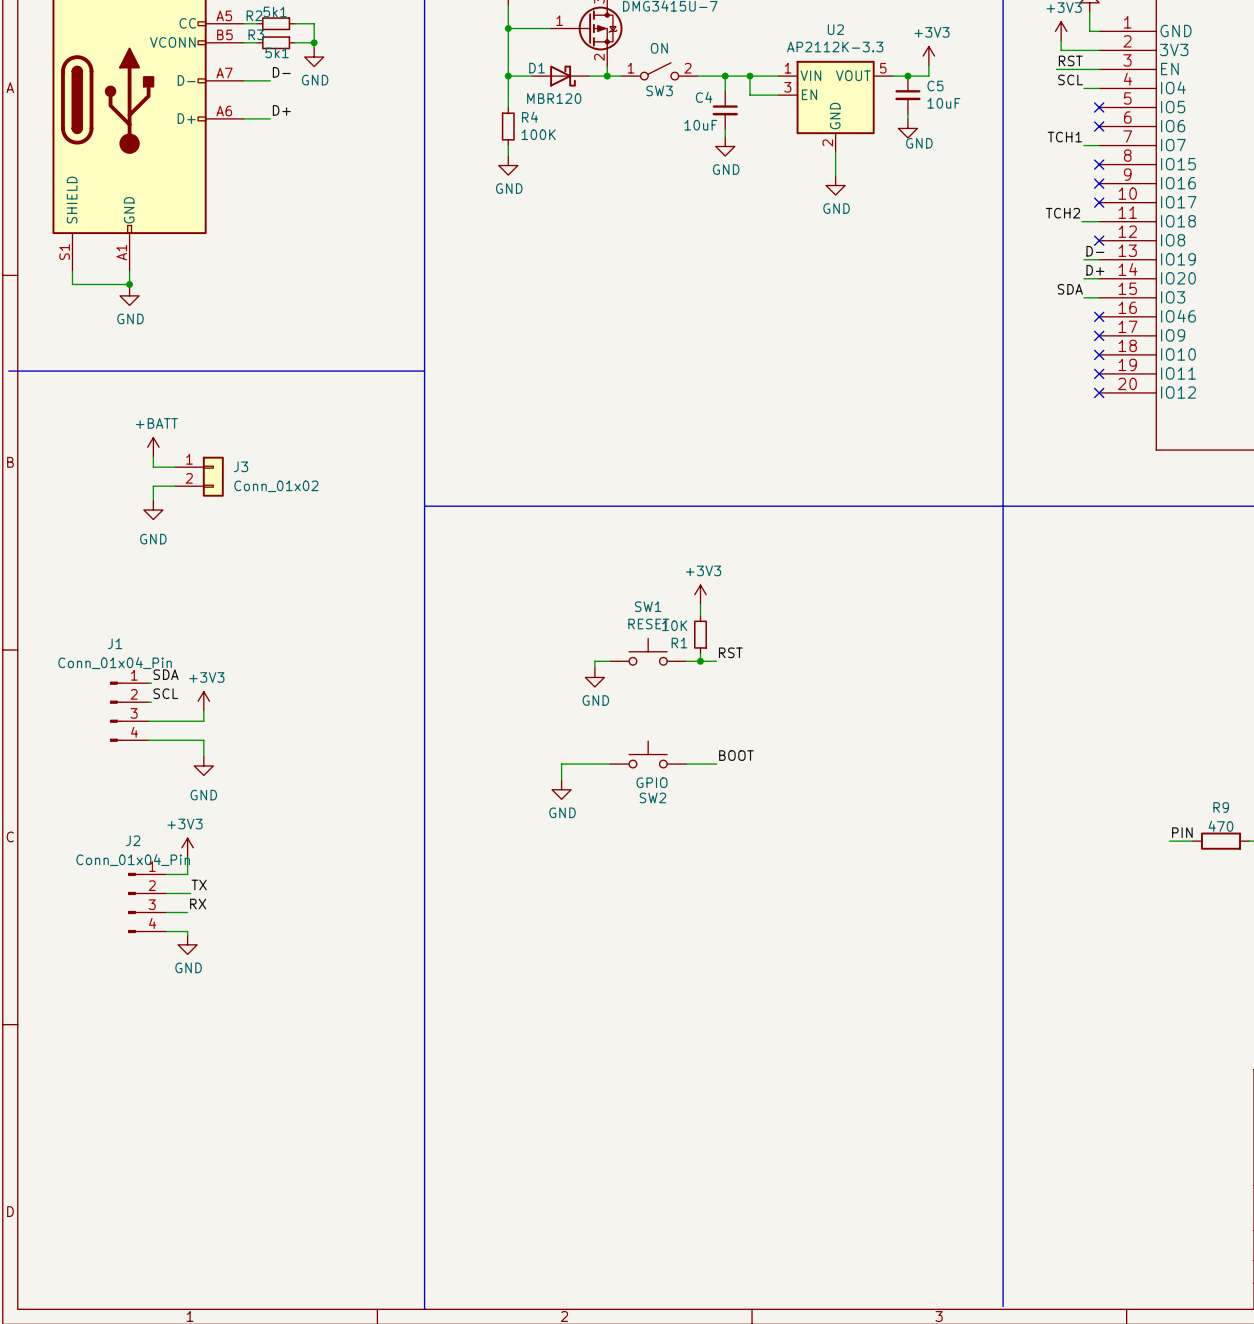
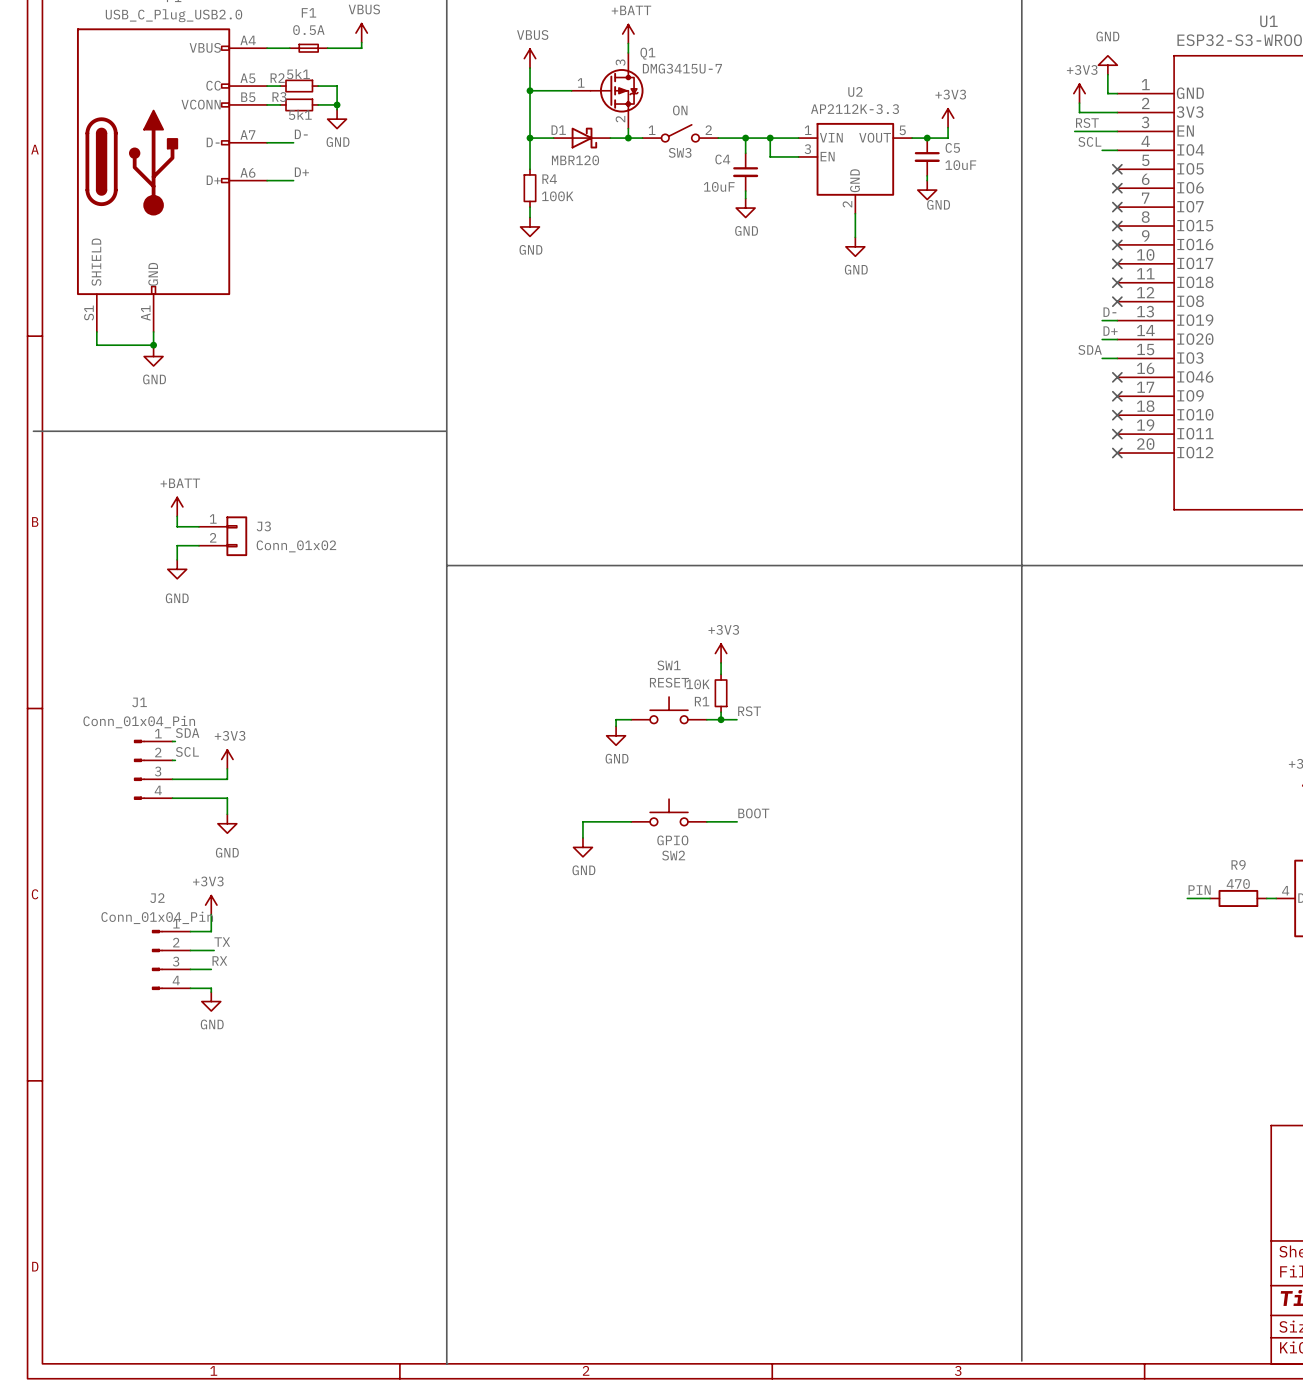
label: TCH1 (1064, 137) -> none
wire: (1083, 145) (1099, 145) -> none
no-connect mark: none -> (1117, 207)
label: TCH2 (1062, 213) -> none
wire: (1082, 221) (1099, 221) -> none
no-connect mark: none -> (1117, 282)

